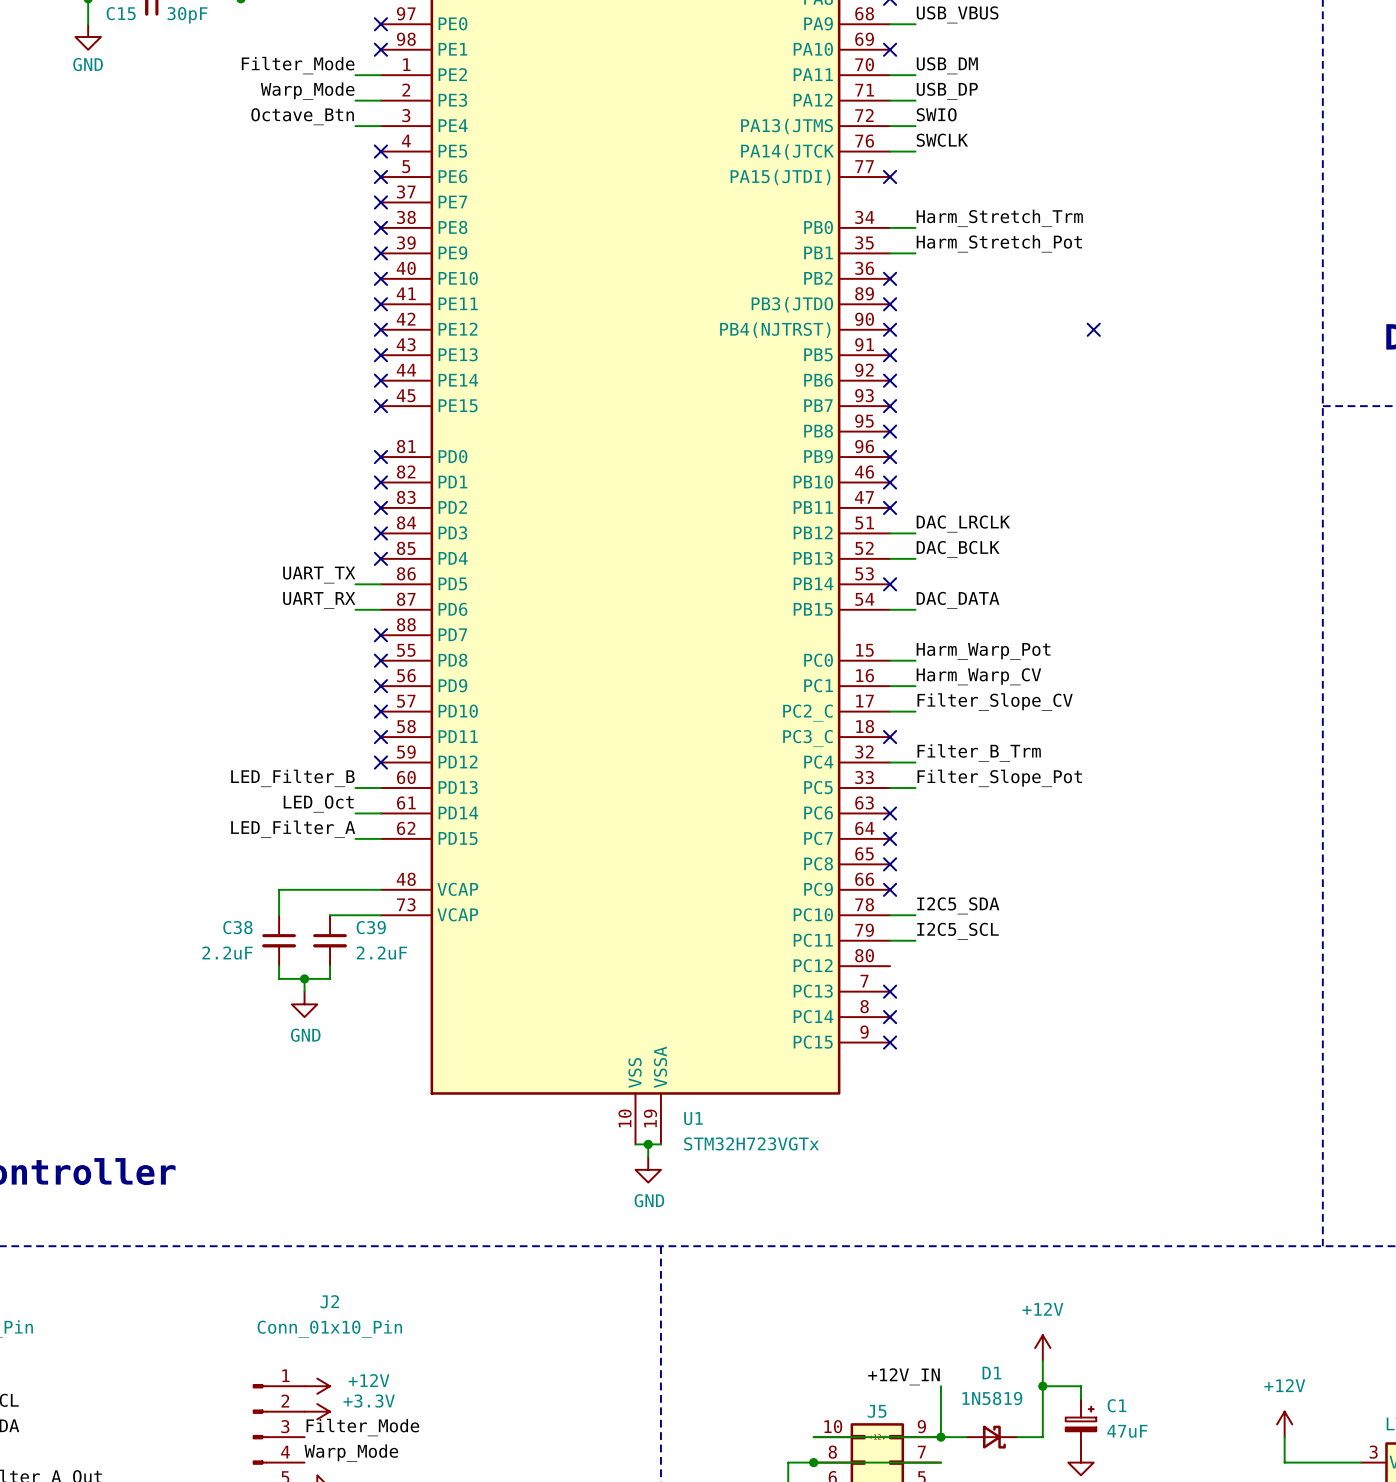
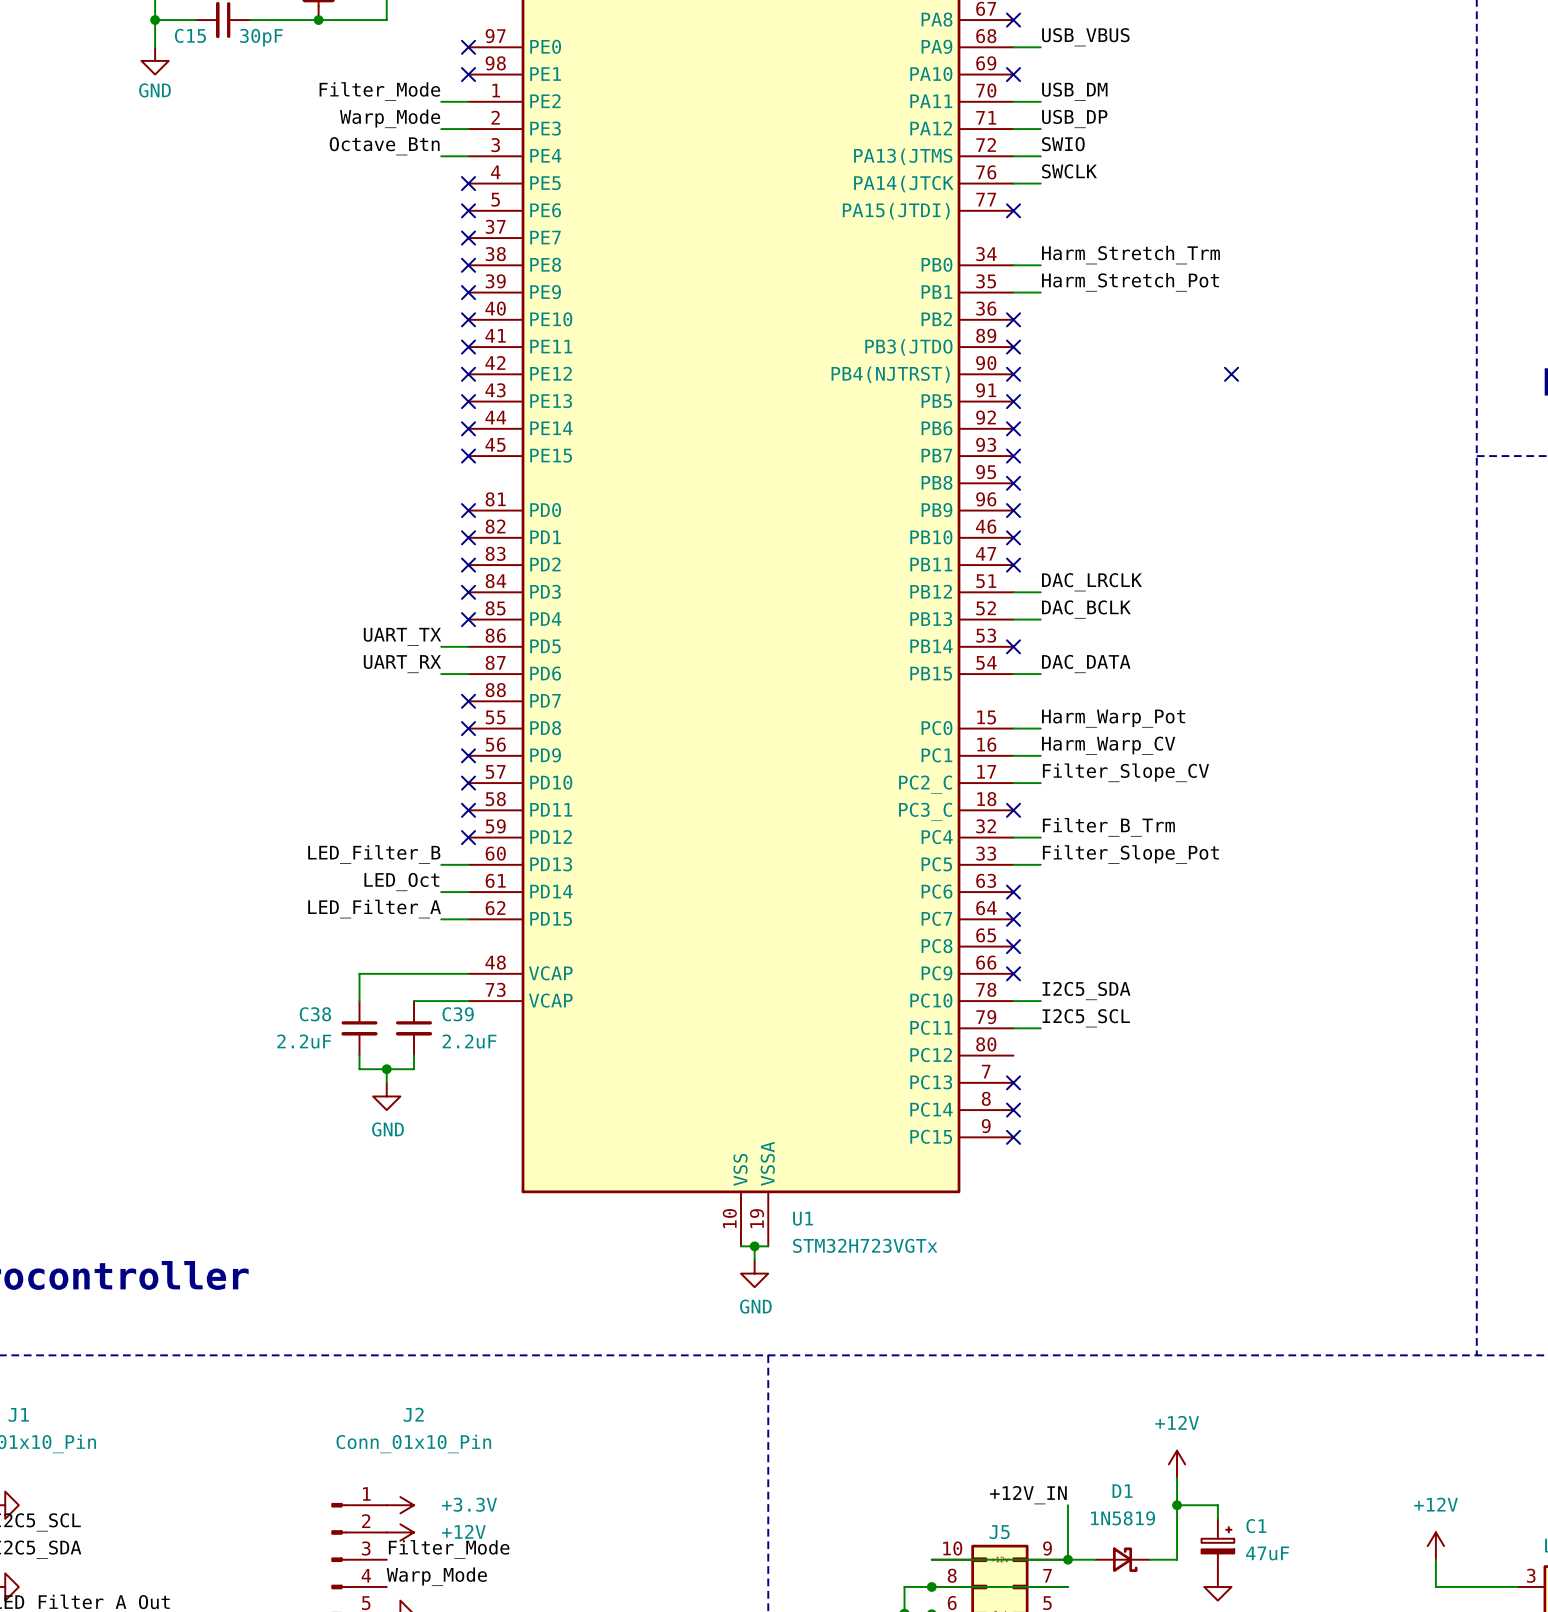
power symbol: +12V (317, 1386) -> +3.3V (400, 1505)
power symbol: +3.3V (317, 1411) -> +12V (400, 1532)

